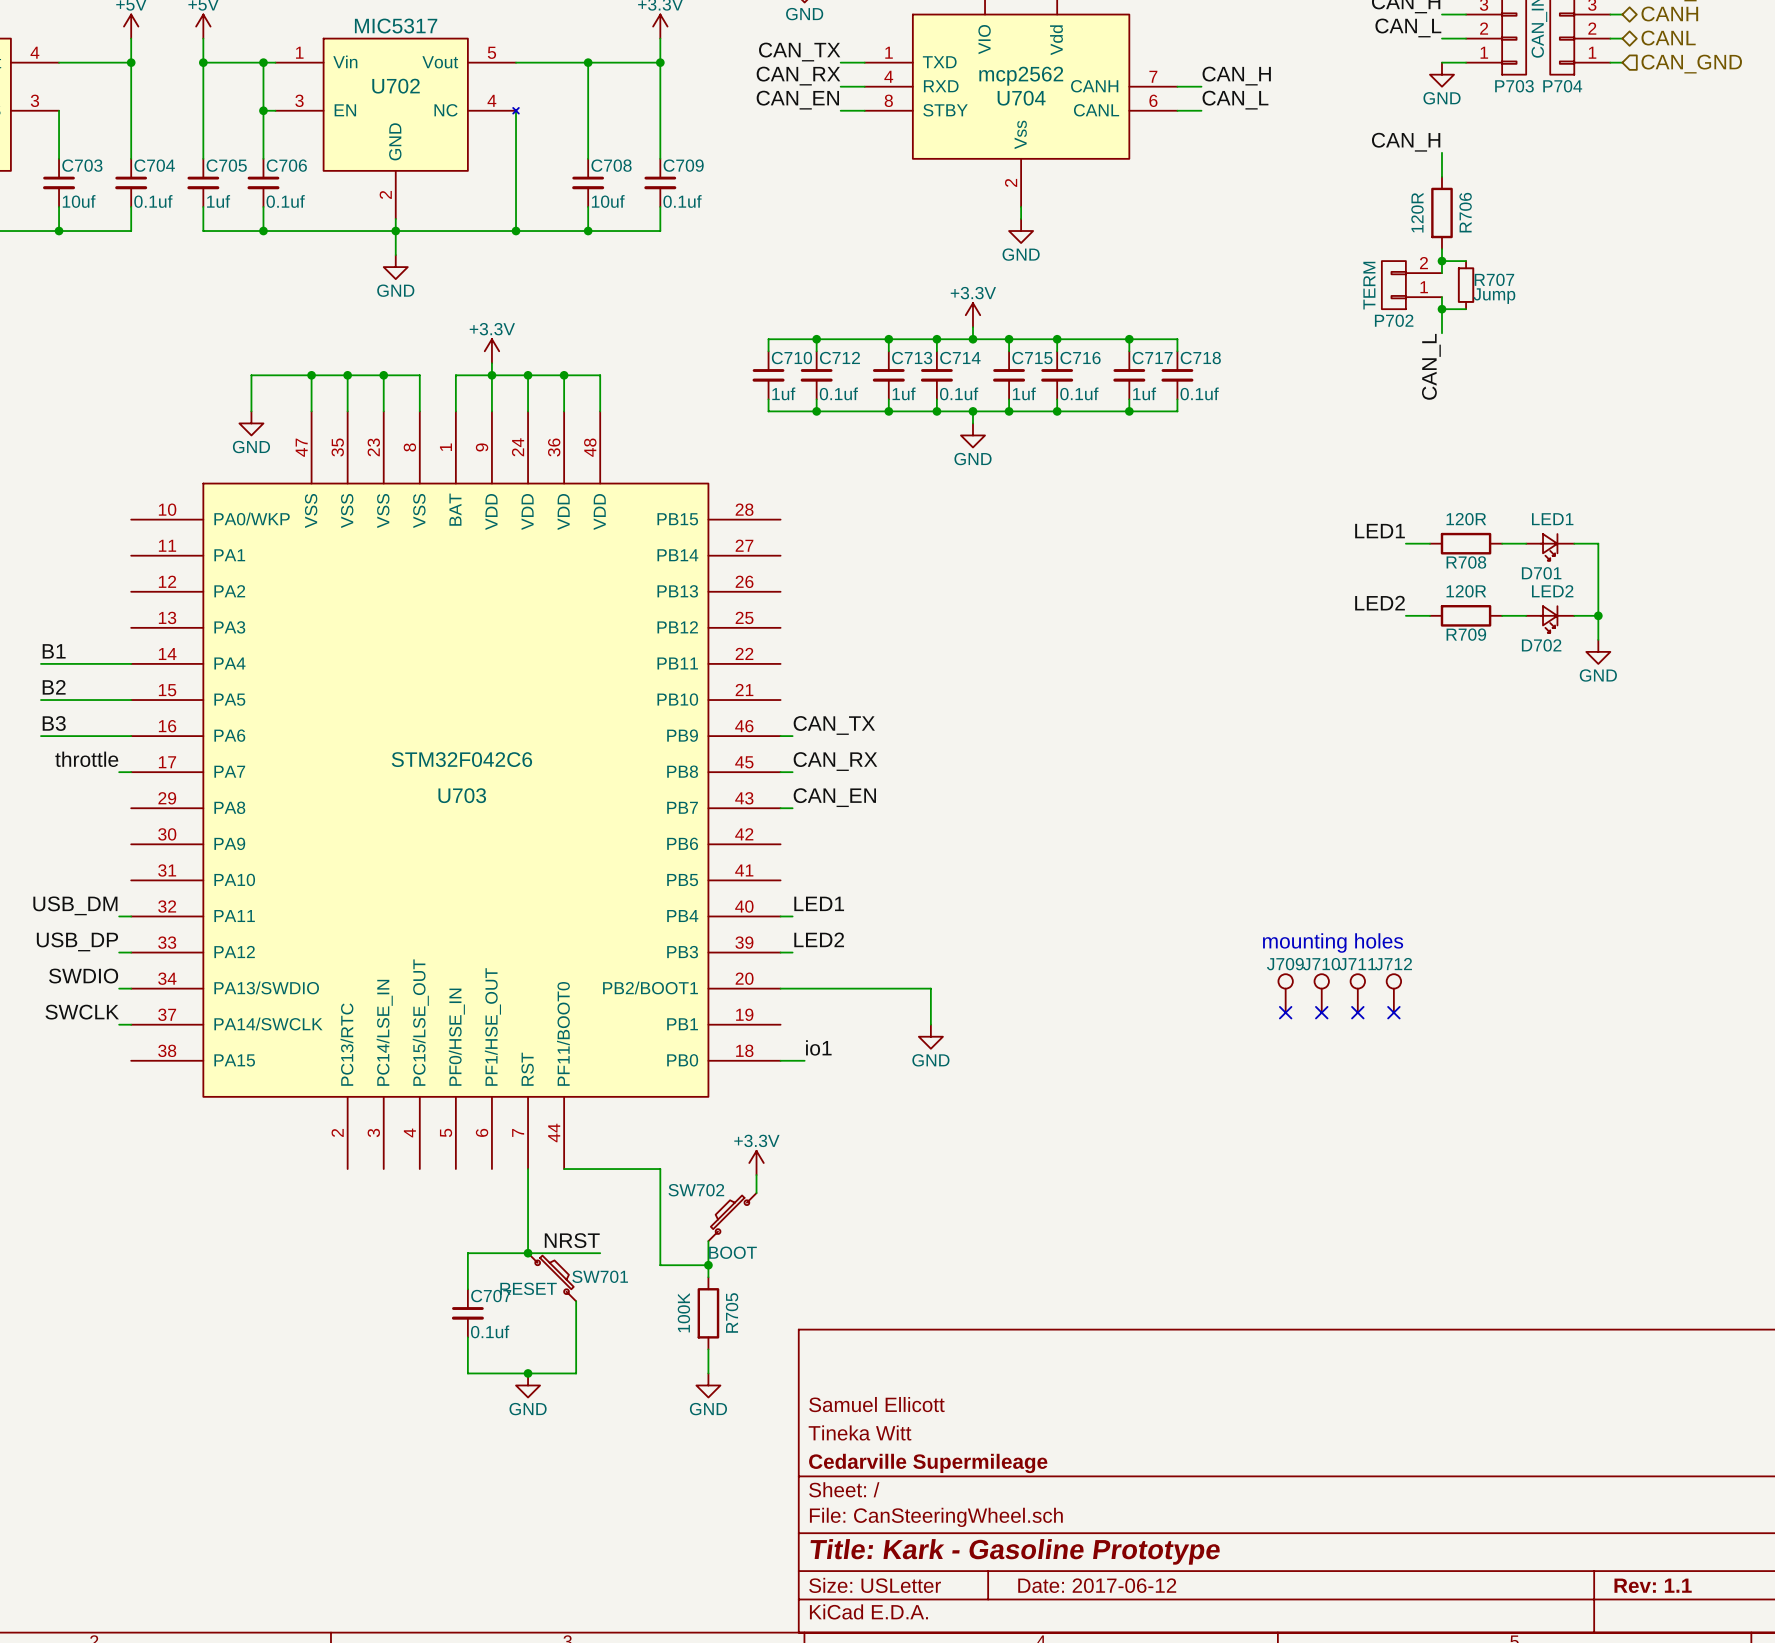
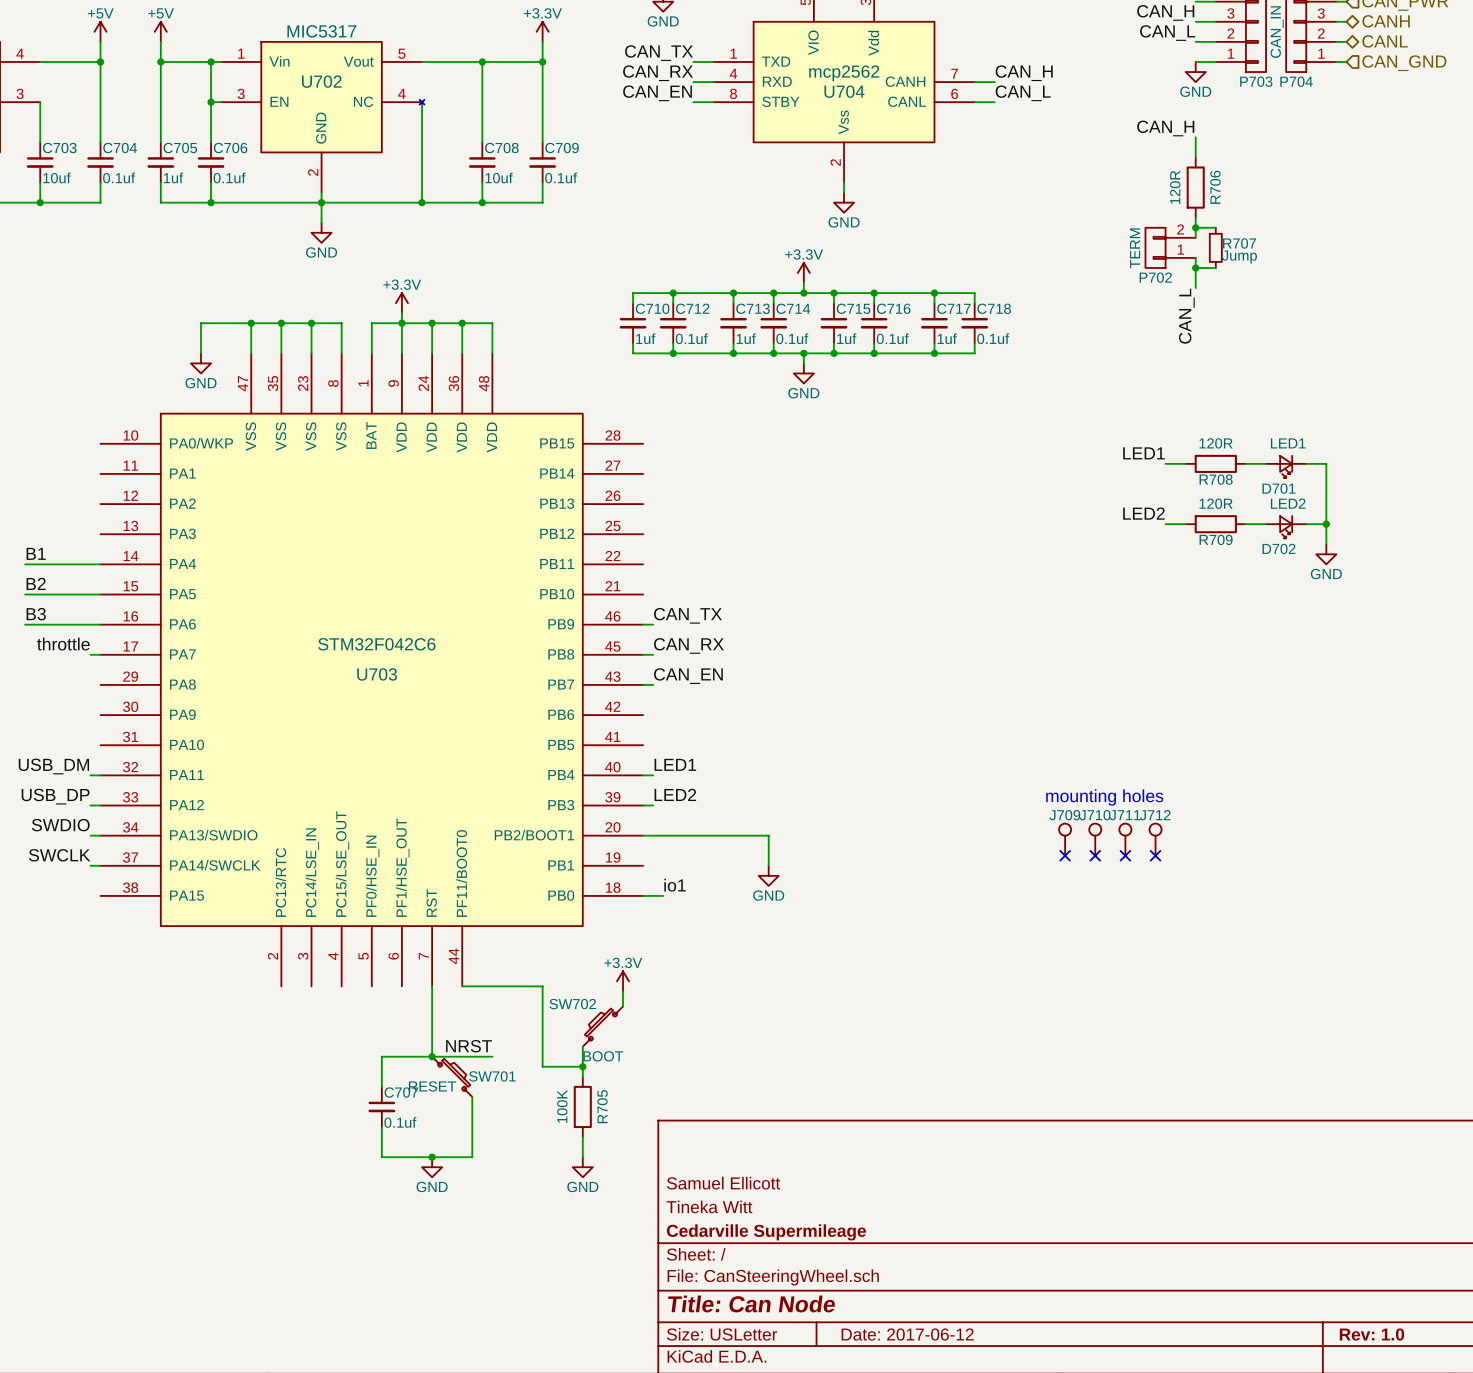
title block: Title: Kark - Gasoline Prototype (1015, 1551) -> Title: Can Node (751, 1304)
title block: Rev: 1.1 (1653, 1585) -> Rev: 1.0 (1371, 1334)

